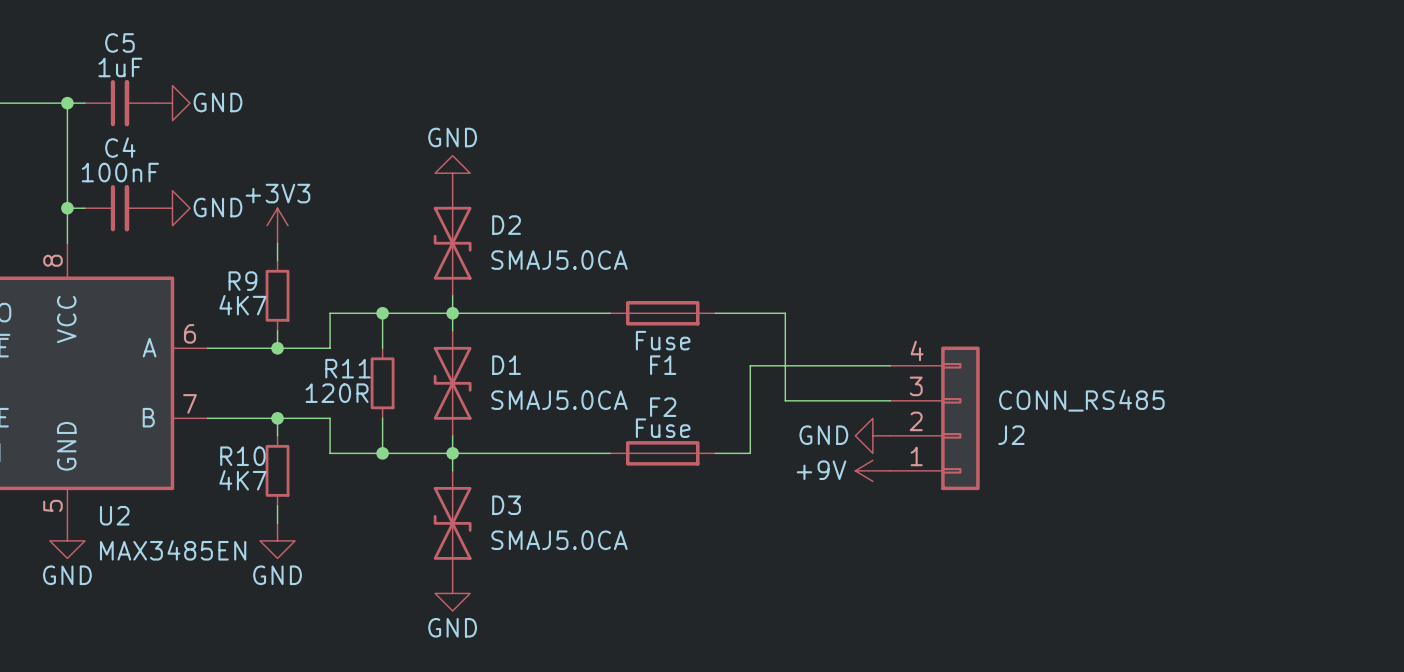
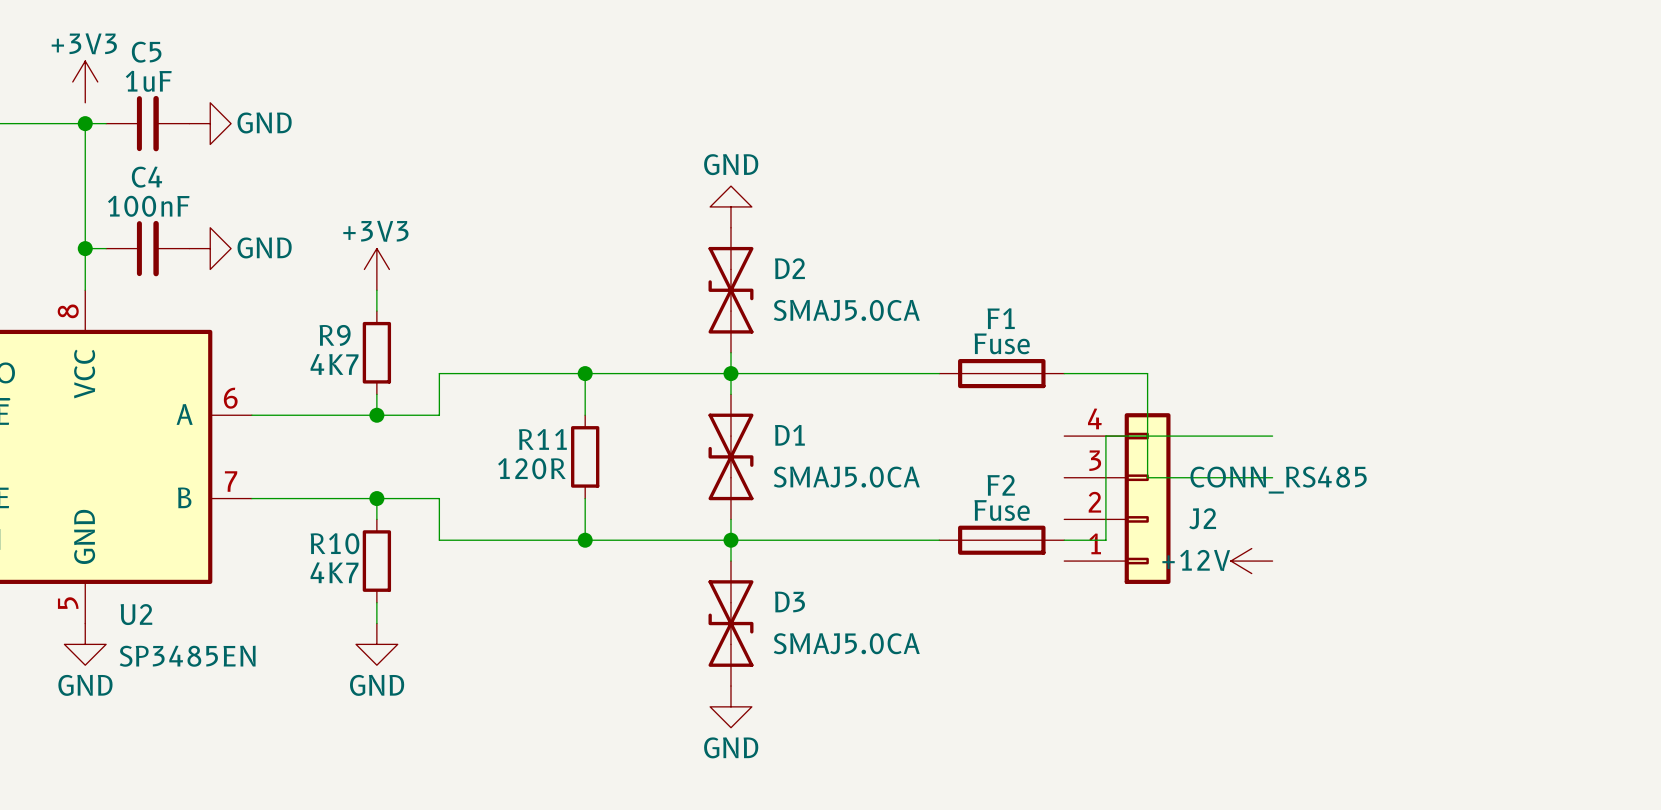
power symbol: none -> +3V3 (85, 81)
power symbol position: GND (452, 173) -> GND (730, 206)
power symbol position: +3V3 (277, 225) -> +3V3 (376, 269)
wire: (277, 243) (277, 260) -> (376, 290) (376, 311)
D2 position: (452, 243) -> (730, 290)
R9 position: (277, 295) -> (376, 352)
wire: (452, 295) (452, 330) -> (730, 352) (730, 394)
wire: (365, 313) (330, 313) (330, 348) -> (439, 373) (439, 415) (397, 415)
wire: (382, 313) (382, 348) -> (585, 373) (585, 415)
junction: (382, 313) -> none
junction position: (452, 313) -> (585, 373)
junction: none -> (730, 373)
F1 position: (662, 313) -> (1001, 373)
wire: (785, 313) (785, 400) (890, 400) -> none
wire: none -> (1064, 373) (1147, 373) (1147, 477) (1272, 477)
wire: (277, 330) (277, 348) -> (376, 394) (376, 415)
F1 value position: Fuse (663, 340) -> Fuse (1002, 343)
junction position: (277, 348) -> (376, 415)
F1 name position: F1 (663, 365) -> F1 (1001, 318)
wire: (890, 365) (750, 365) (750, 453) -> (939, 540) (897, 540)
wire: none -> (1272, 436) (1105, 436) (1105, 540) (1064, 540)
R11 position: (382, 383) -> (585, 456)
D1 position: (452, 383) -> (730, 456)
wire: (277, 418) (277, 435) -> (376, 498) (376, 519)
junction position: (277, 418) -> (376, 498)
wire: (330, 418) (330, 453) (365, 453) -> (397, 498) (439, 498) (439, 540)
wire: (382, 418) (382, 453) -> (585, 498) (585, 540)
wire: (452, 435) (452, 470) -> (730, 519) (730, 561)
power symbol: GND (872, 435) -> none
junction: (382, 453) -> none
junction position: (452, 453) -> (585, 540)
junction: none -> (730, 540)
F2 position: (662, 453) -> (1001, 540)
R10 position: (277, 470) -> (376, 561)
power symbol: +9V (872, 470) -> none
power symbol: none -> +12V (1251, 561)
wire: (277, 505) (277, 523) -> (376, 602) (376, 623)
D3 position: (452, 523) -> (730, 623)
power symbol position: GND (277, 540) -> GND (376, 644)
U2 value: MAX3485EN (173, 550) -> SP3485EN (187, 656)
power symbol: GND (452, 593) -> none
power symbol: none -> GND (730, 706)

